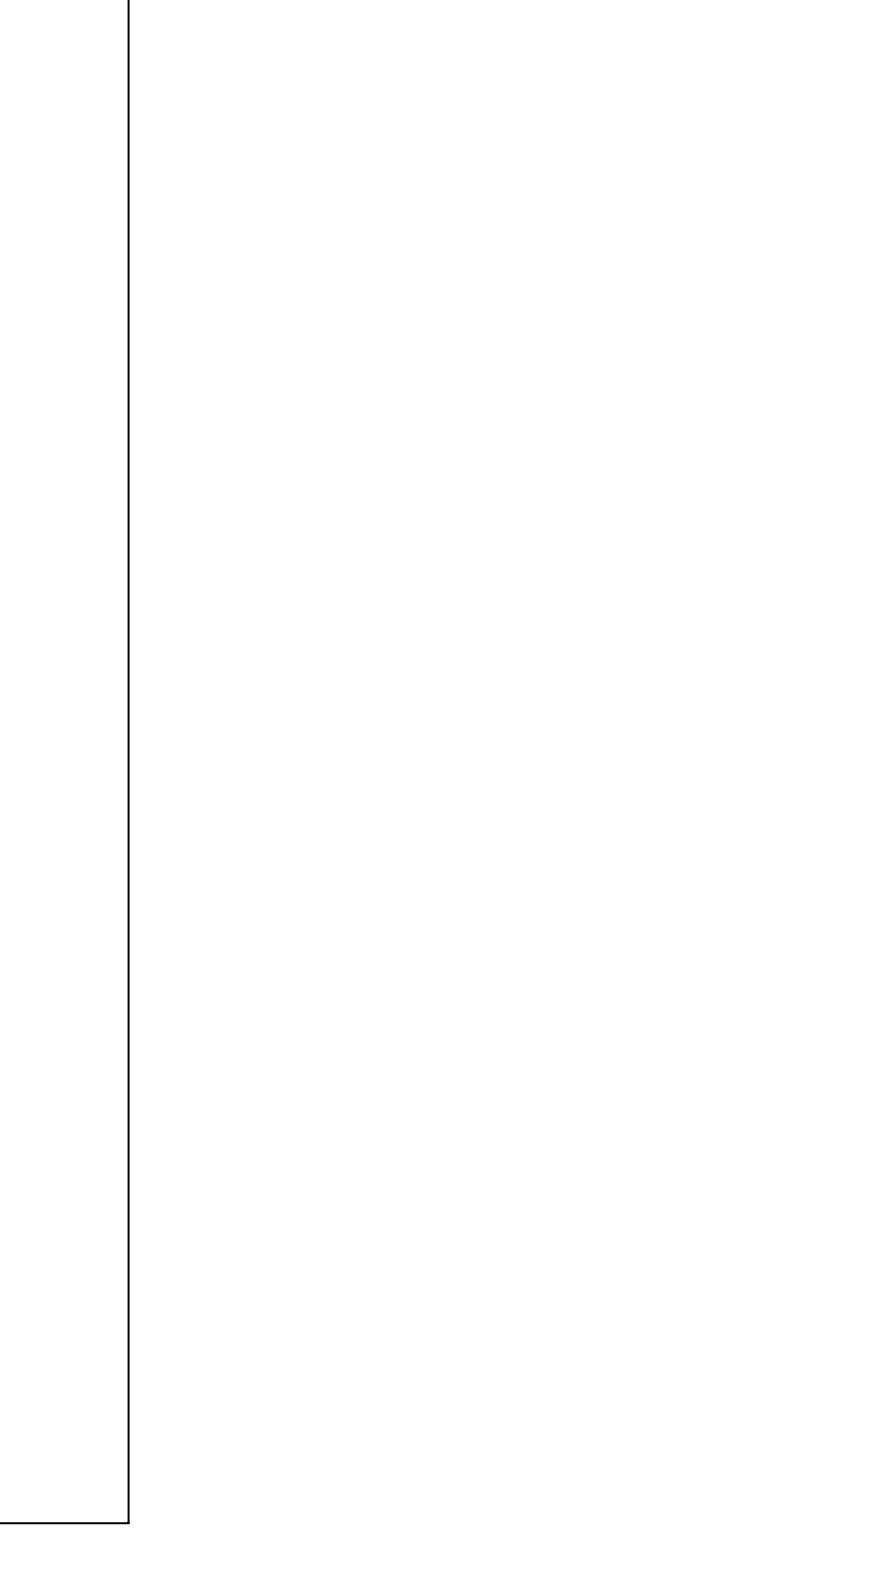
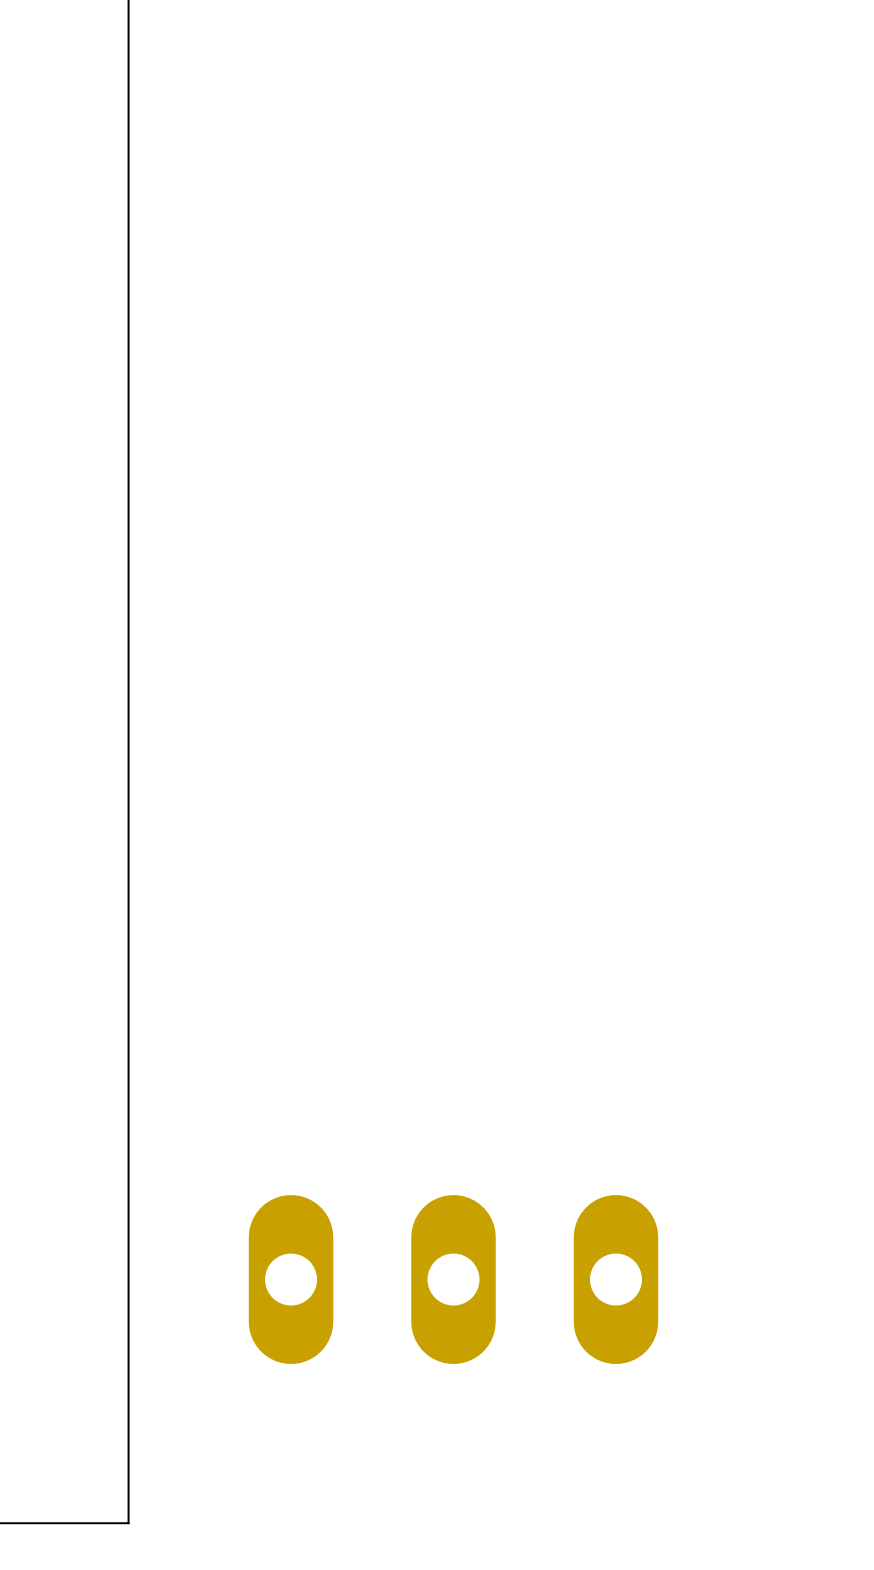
part: none -> (453, 1279)

